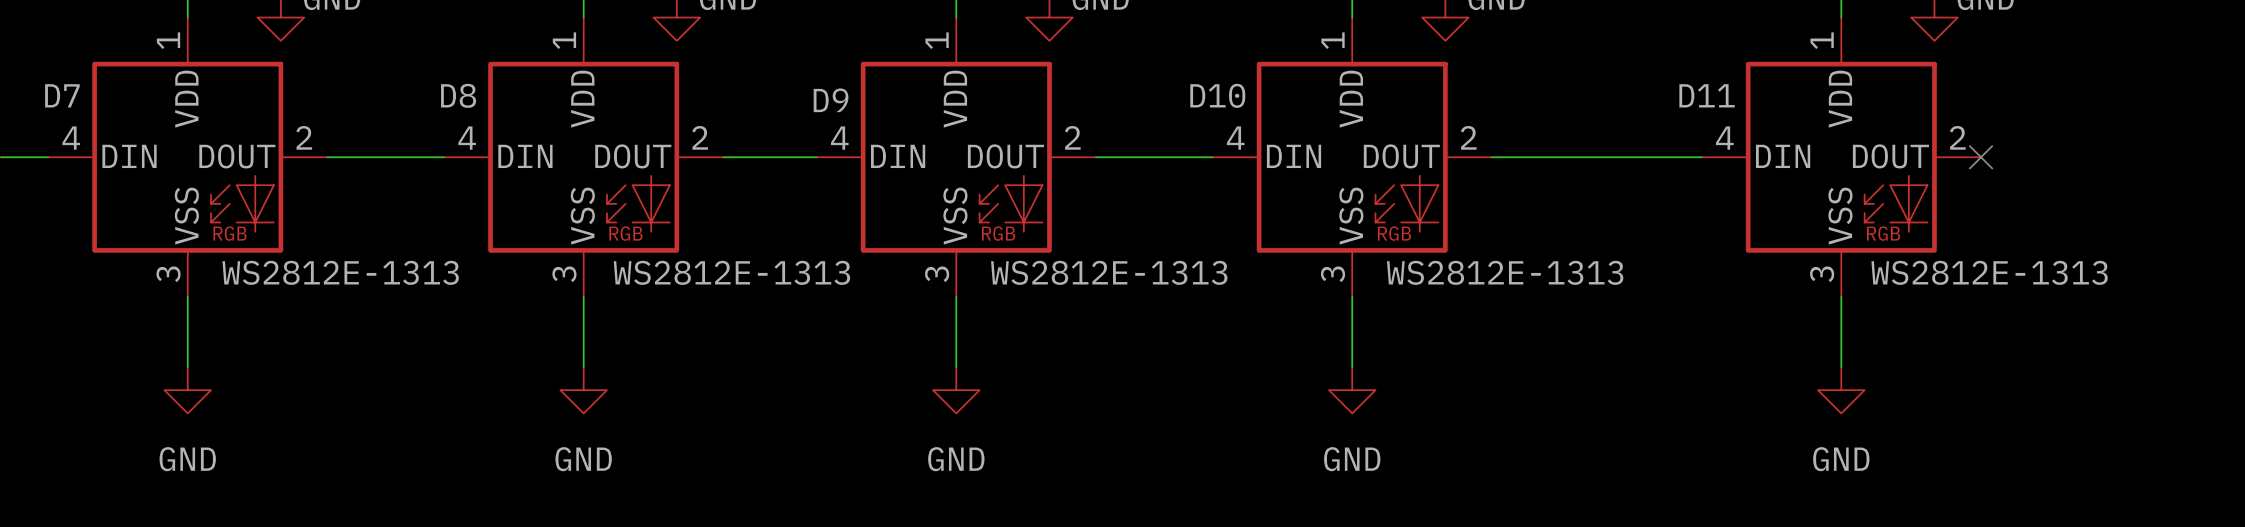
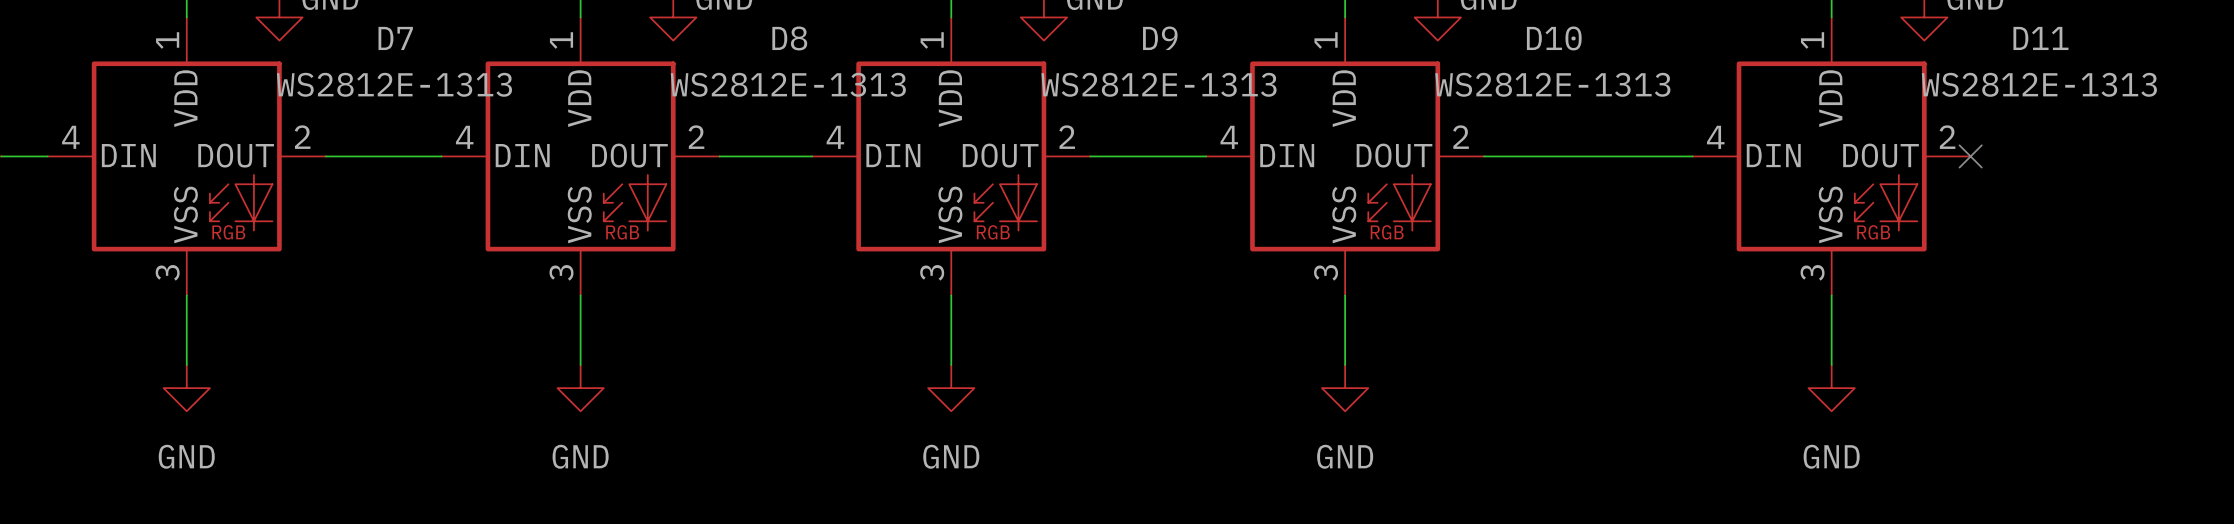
D7 name position: D7 (62, 95) -> D7 (395, 38)
D8 name position: D8 (458, 95) -> D8 (789, 38)
D10 name position: D10 (1217, 95) -> D10 (1554, 38)
D11 name position: D11 (1707, 95) -> D11 (2040, 38)
D9 name position: D9 (831, 100) -> D9 (1160, 38)
D7 value position: WS2812E-1313 (340, 272) -> WS2812E-1313 (394, 84)
D8 value position: WS2812E-1313 (731, 272) -> WS2812E-1313 (788, 84)
D9 value position: WS2812E-1313 (1109, 272) -> WS2812E-1313 (1159, 84)
D10 value position: WS2812E-1313 (1505, 272) -> WS2812E-1313 (1552, 84)
D11 value position: WS2812E-1313 (1989, 272) -> WS2812E-1313 (2039, 84)

